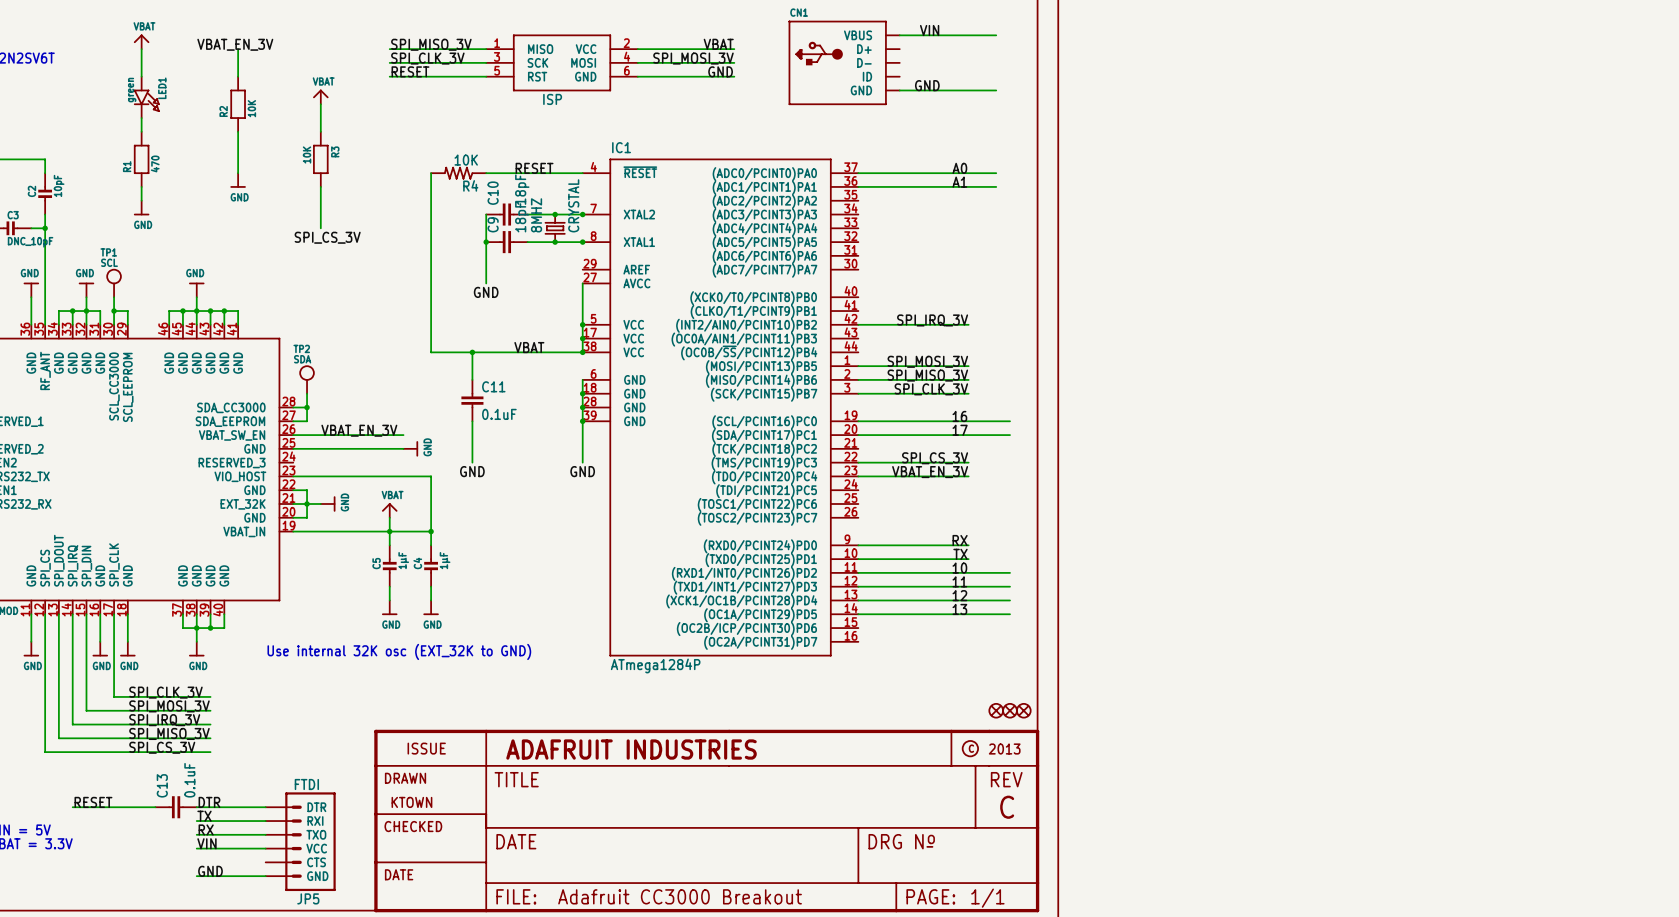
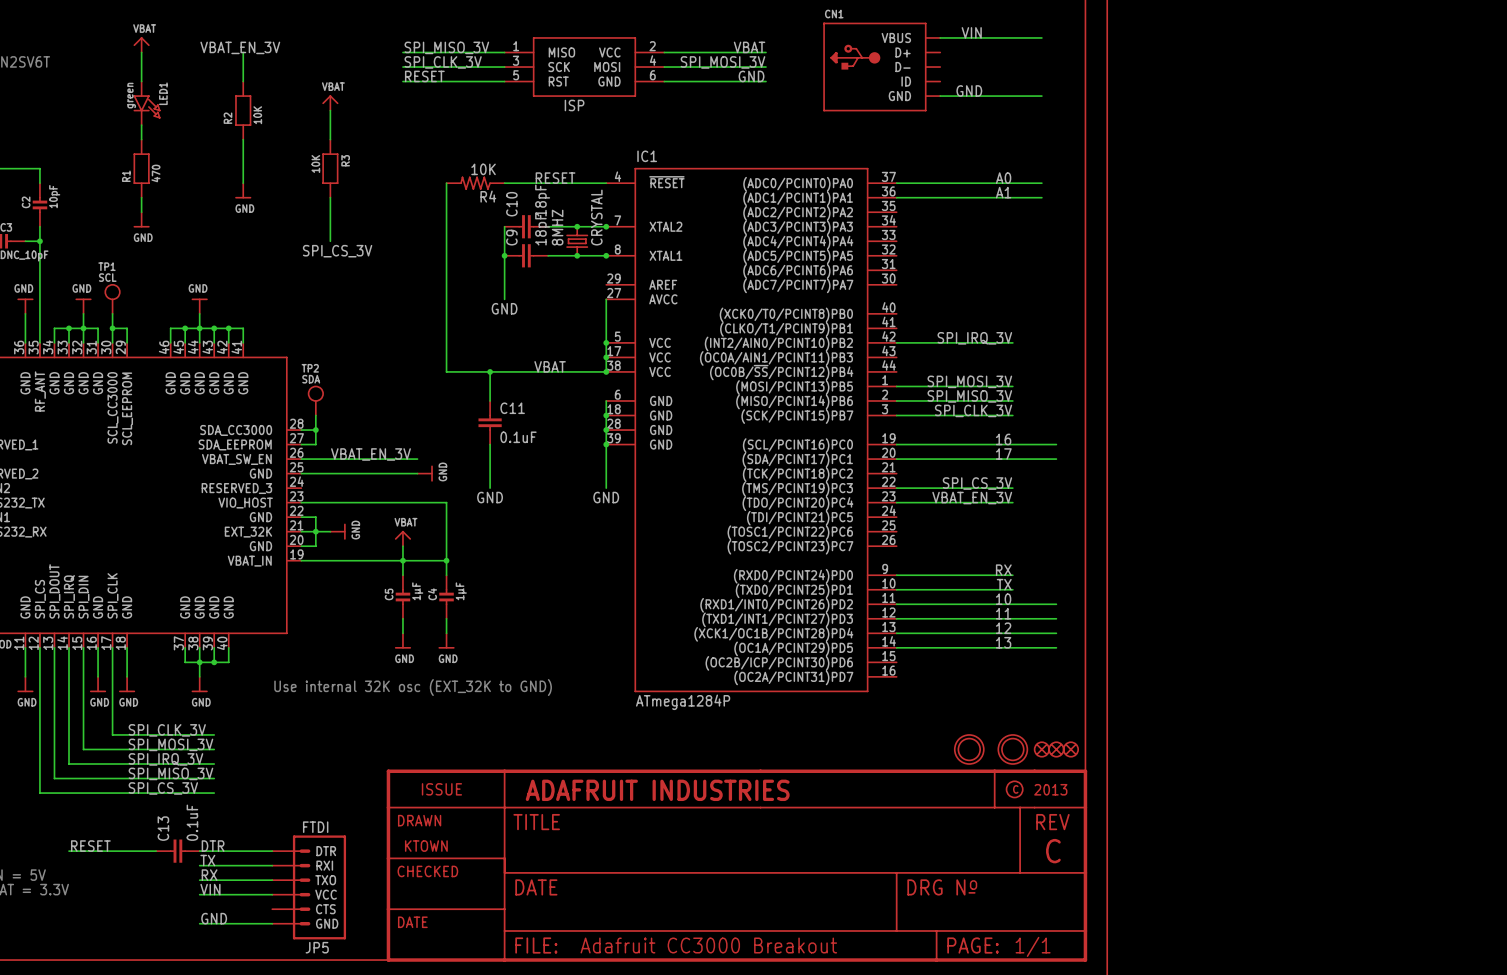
part: none -> (969, 749)
part: none -> (1012, 749)

